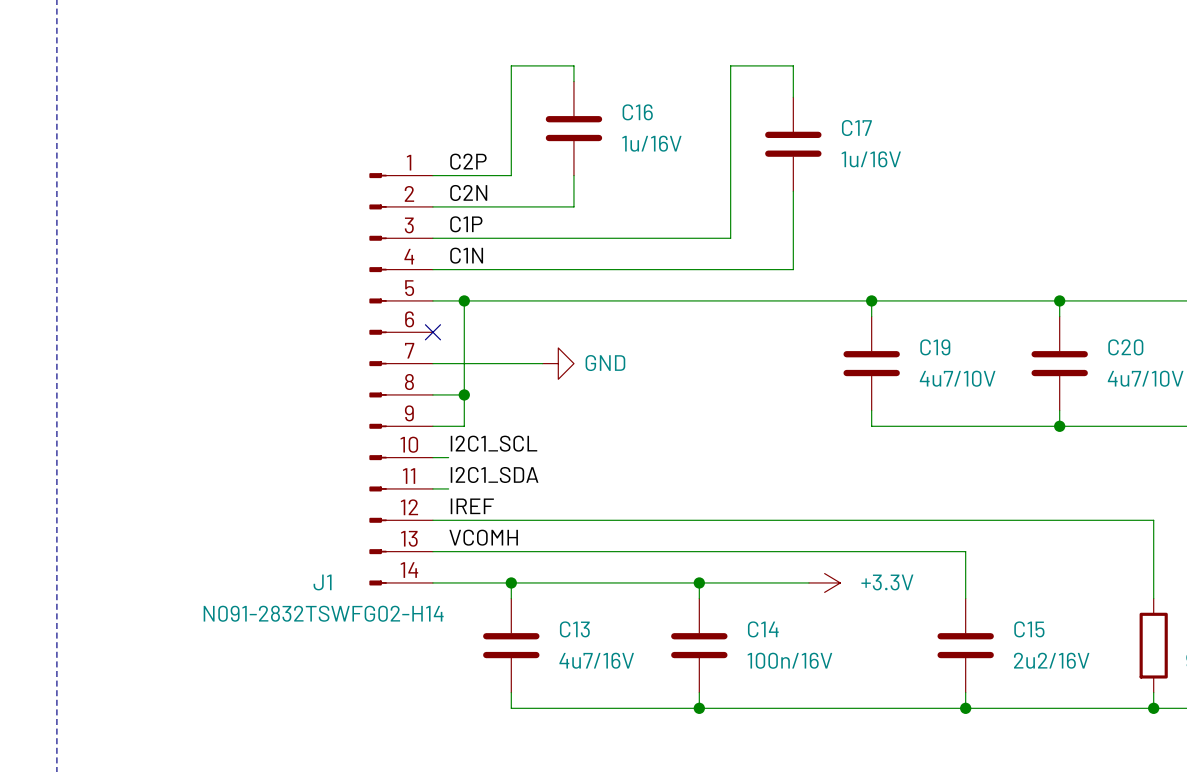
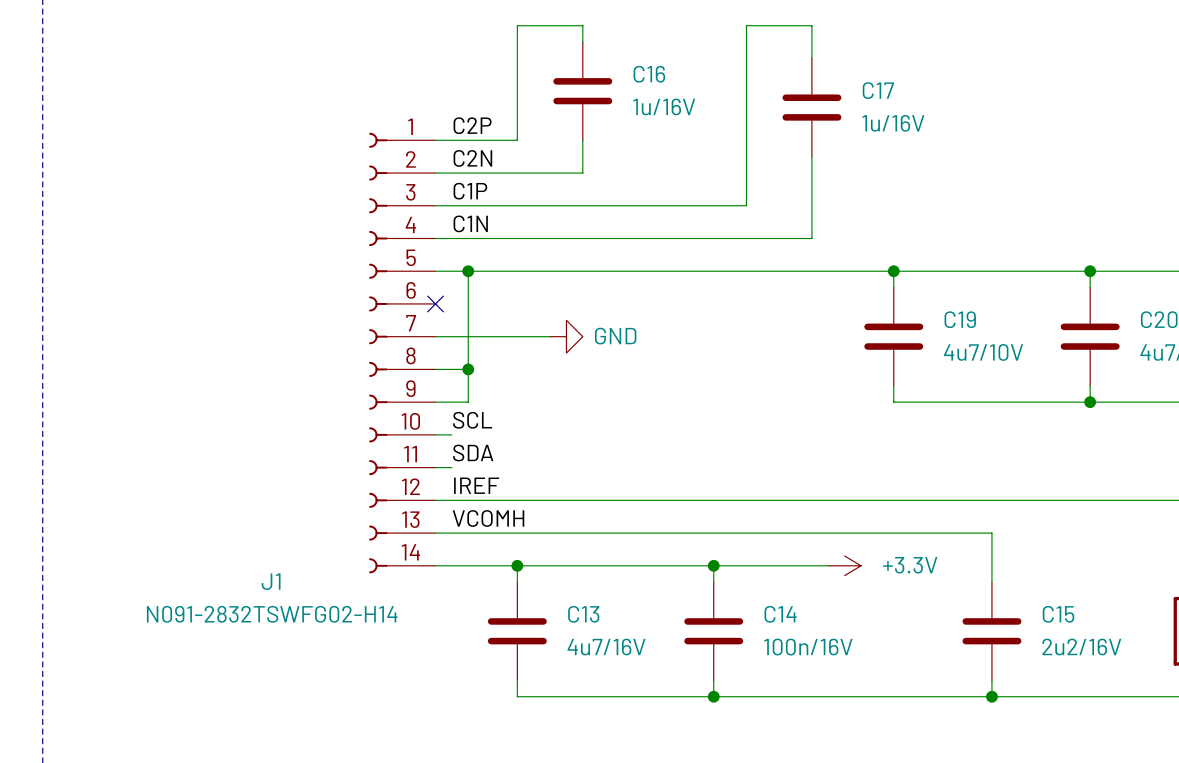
J1 symbol: [369, 173, 433, 586] -> [369, 132, 436, 574]
label: I2C1_SCL (493, 443) -> SCL (472, 420)
label: I2C1_SDA (494, 474) -> SDA (473, 453)
J1 name position: J1 (322, 582) -> J1 (271, 581)
J1 value position: N091-2832TSWFG02-H14 (323, 613) -> N091-2832TSWFG02-H14 (272, 614)

